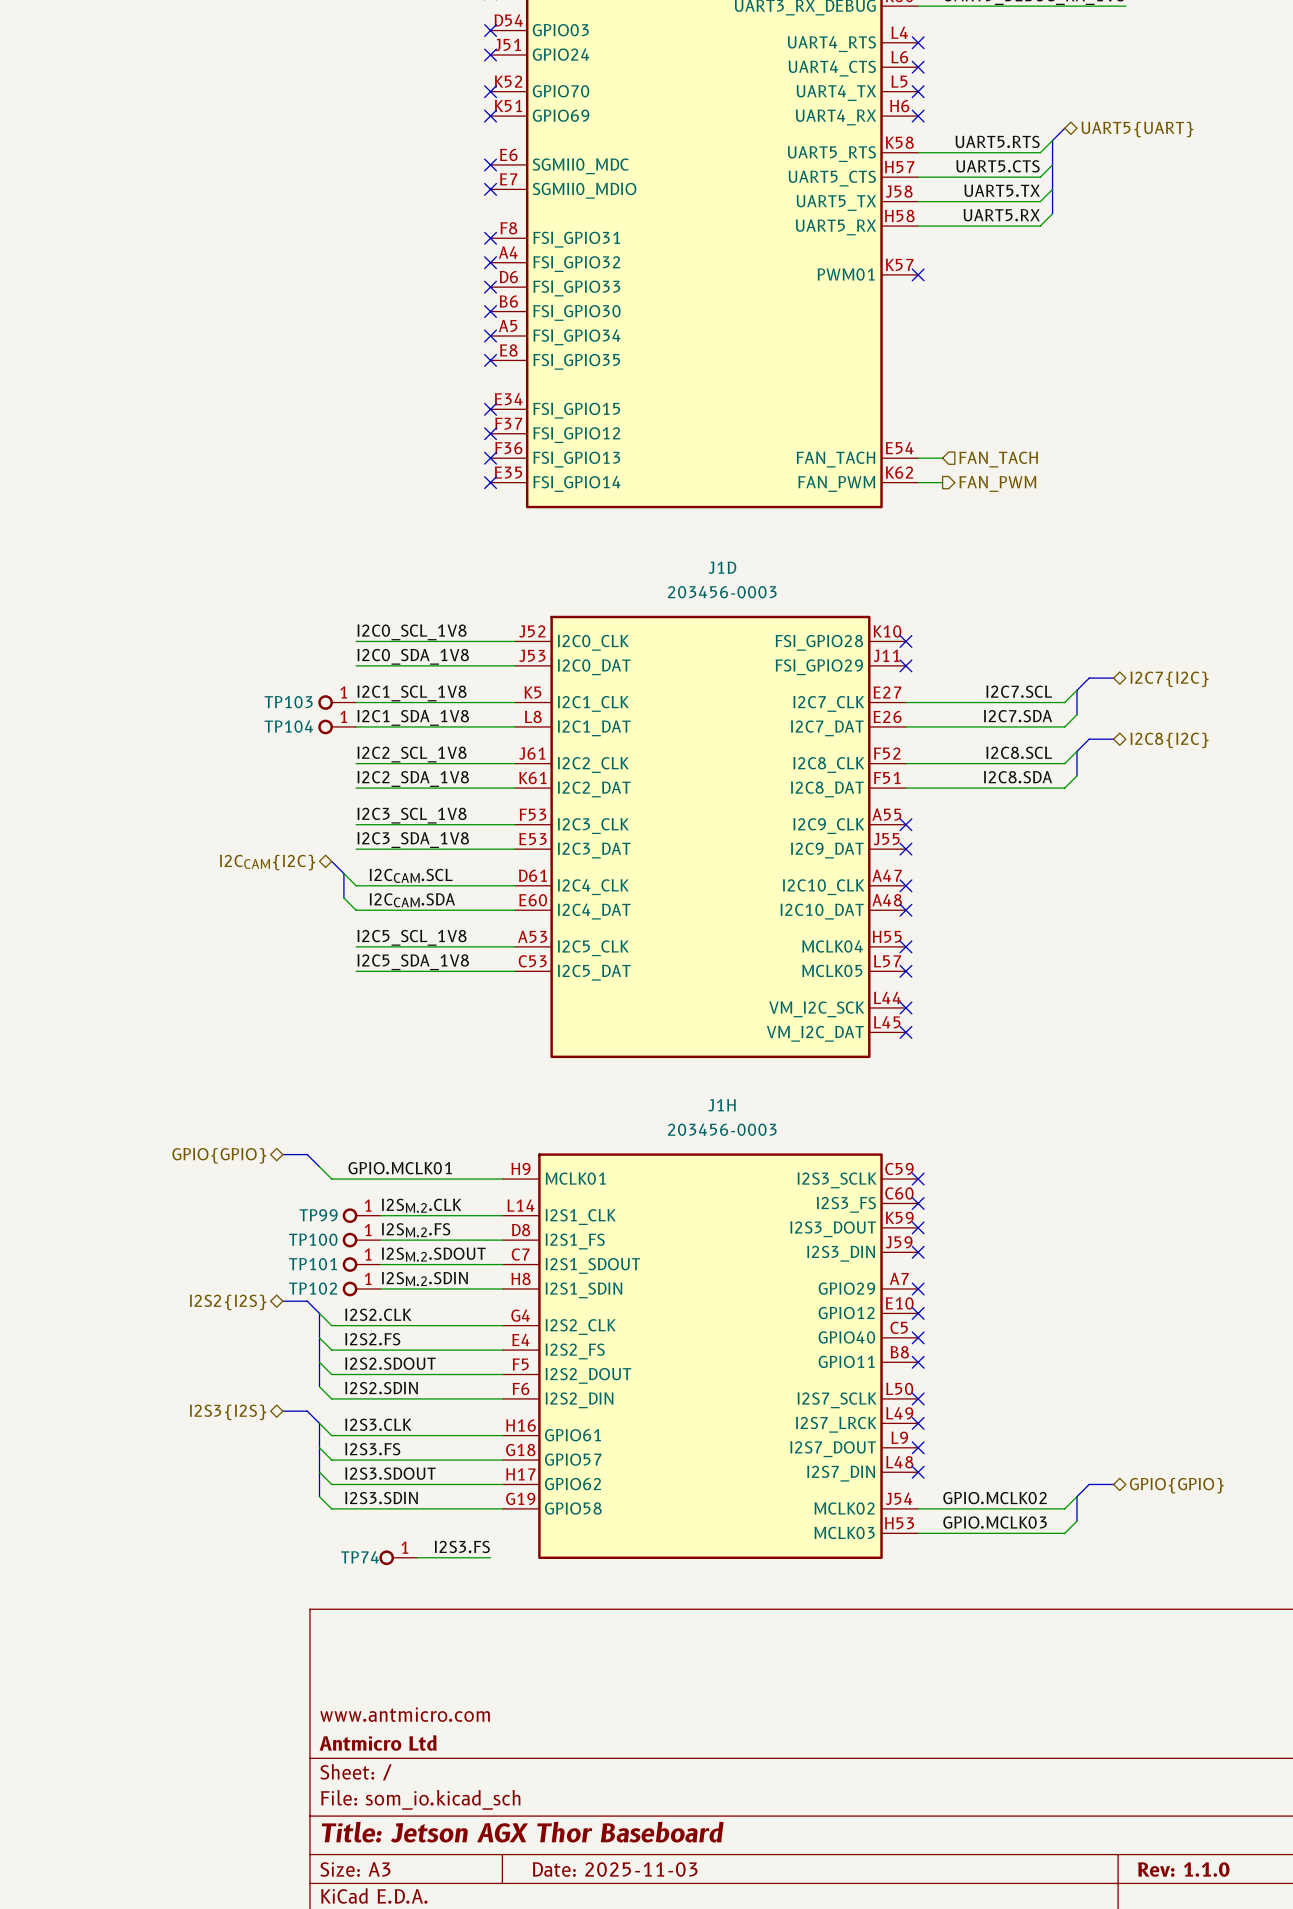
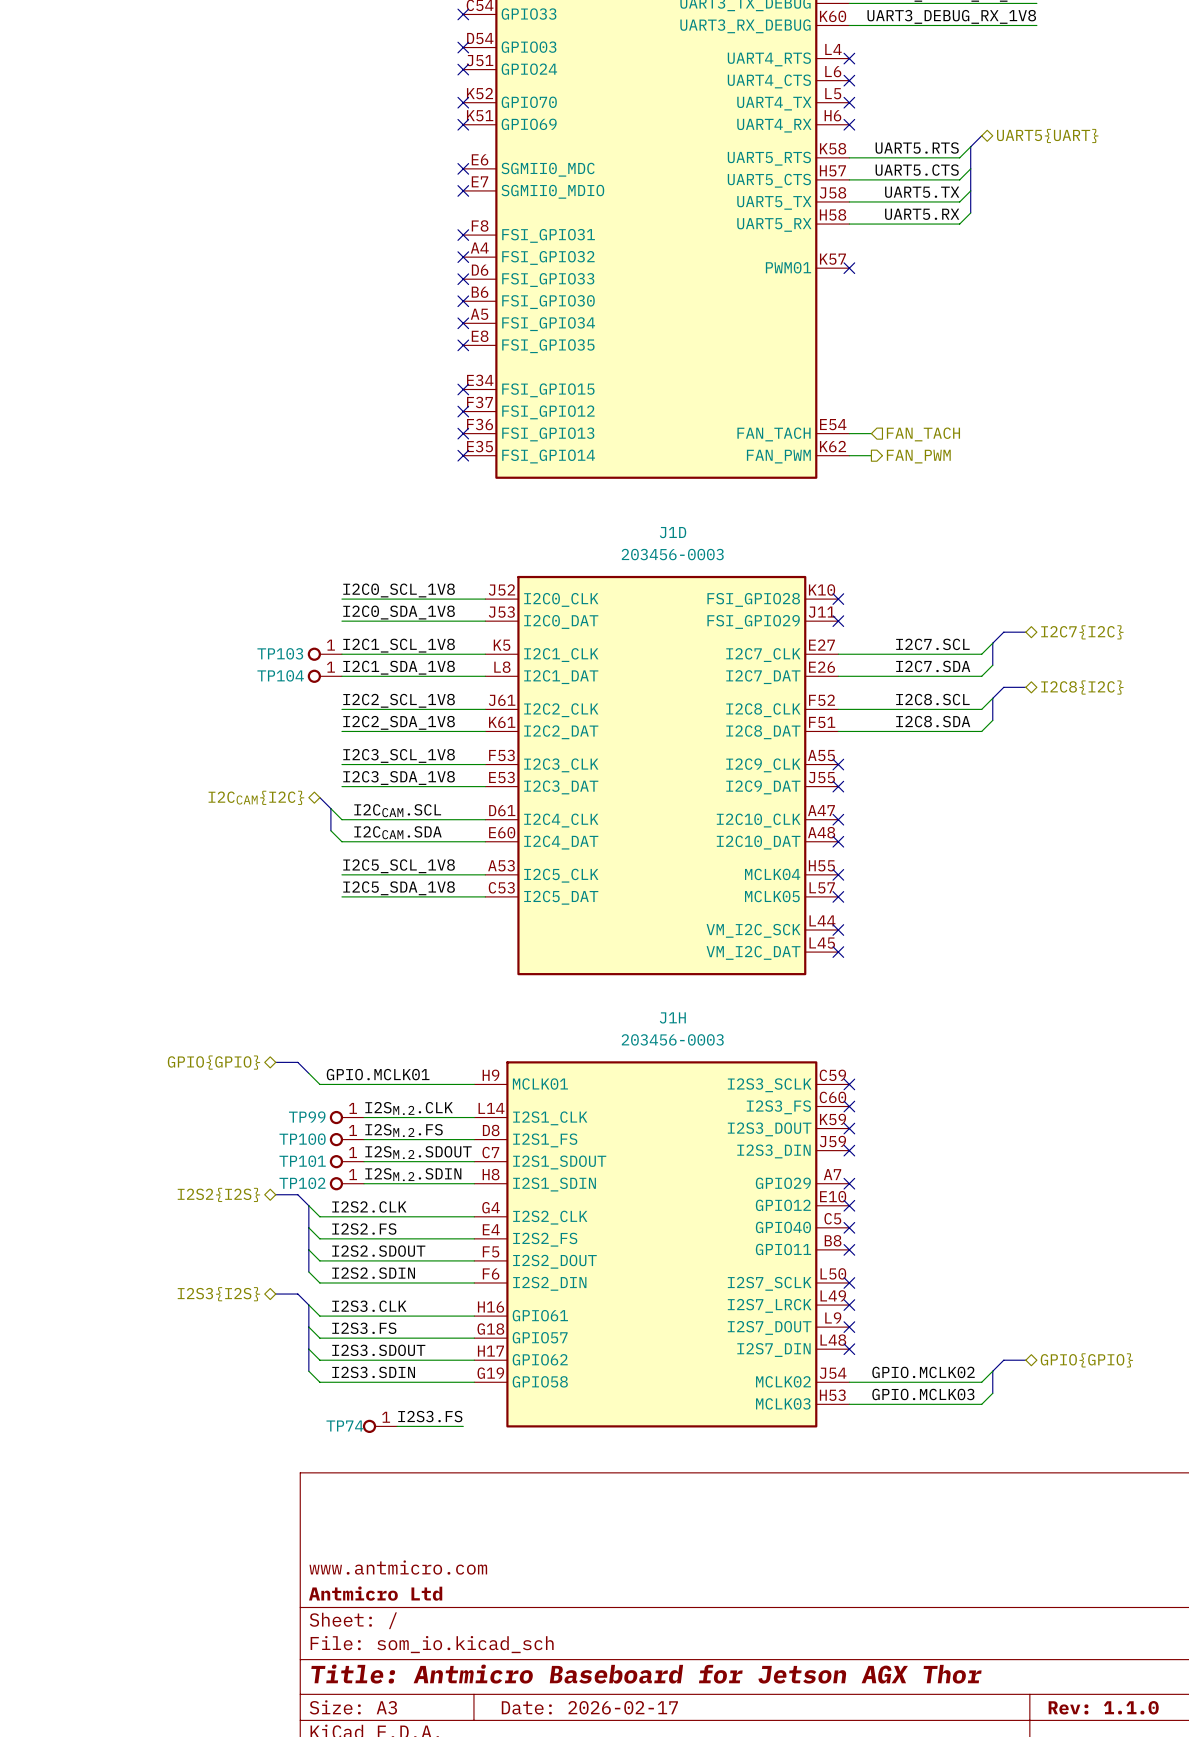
title block: Title: Jetson AGX Thor Baseboard (522, 1832) -> Title: Antmicro Baseboard for Jetson AGX Thor (646, 1674)
title block: Date: 2025-11-03 (615, 1869) -> Date: 2026-02-17 (589, 1707)

